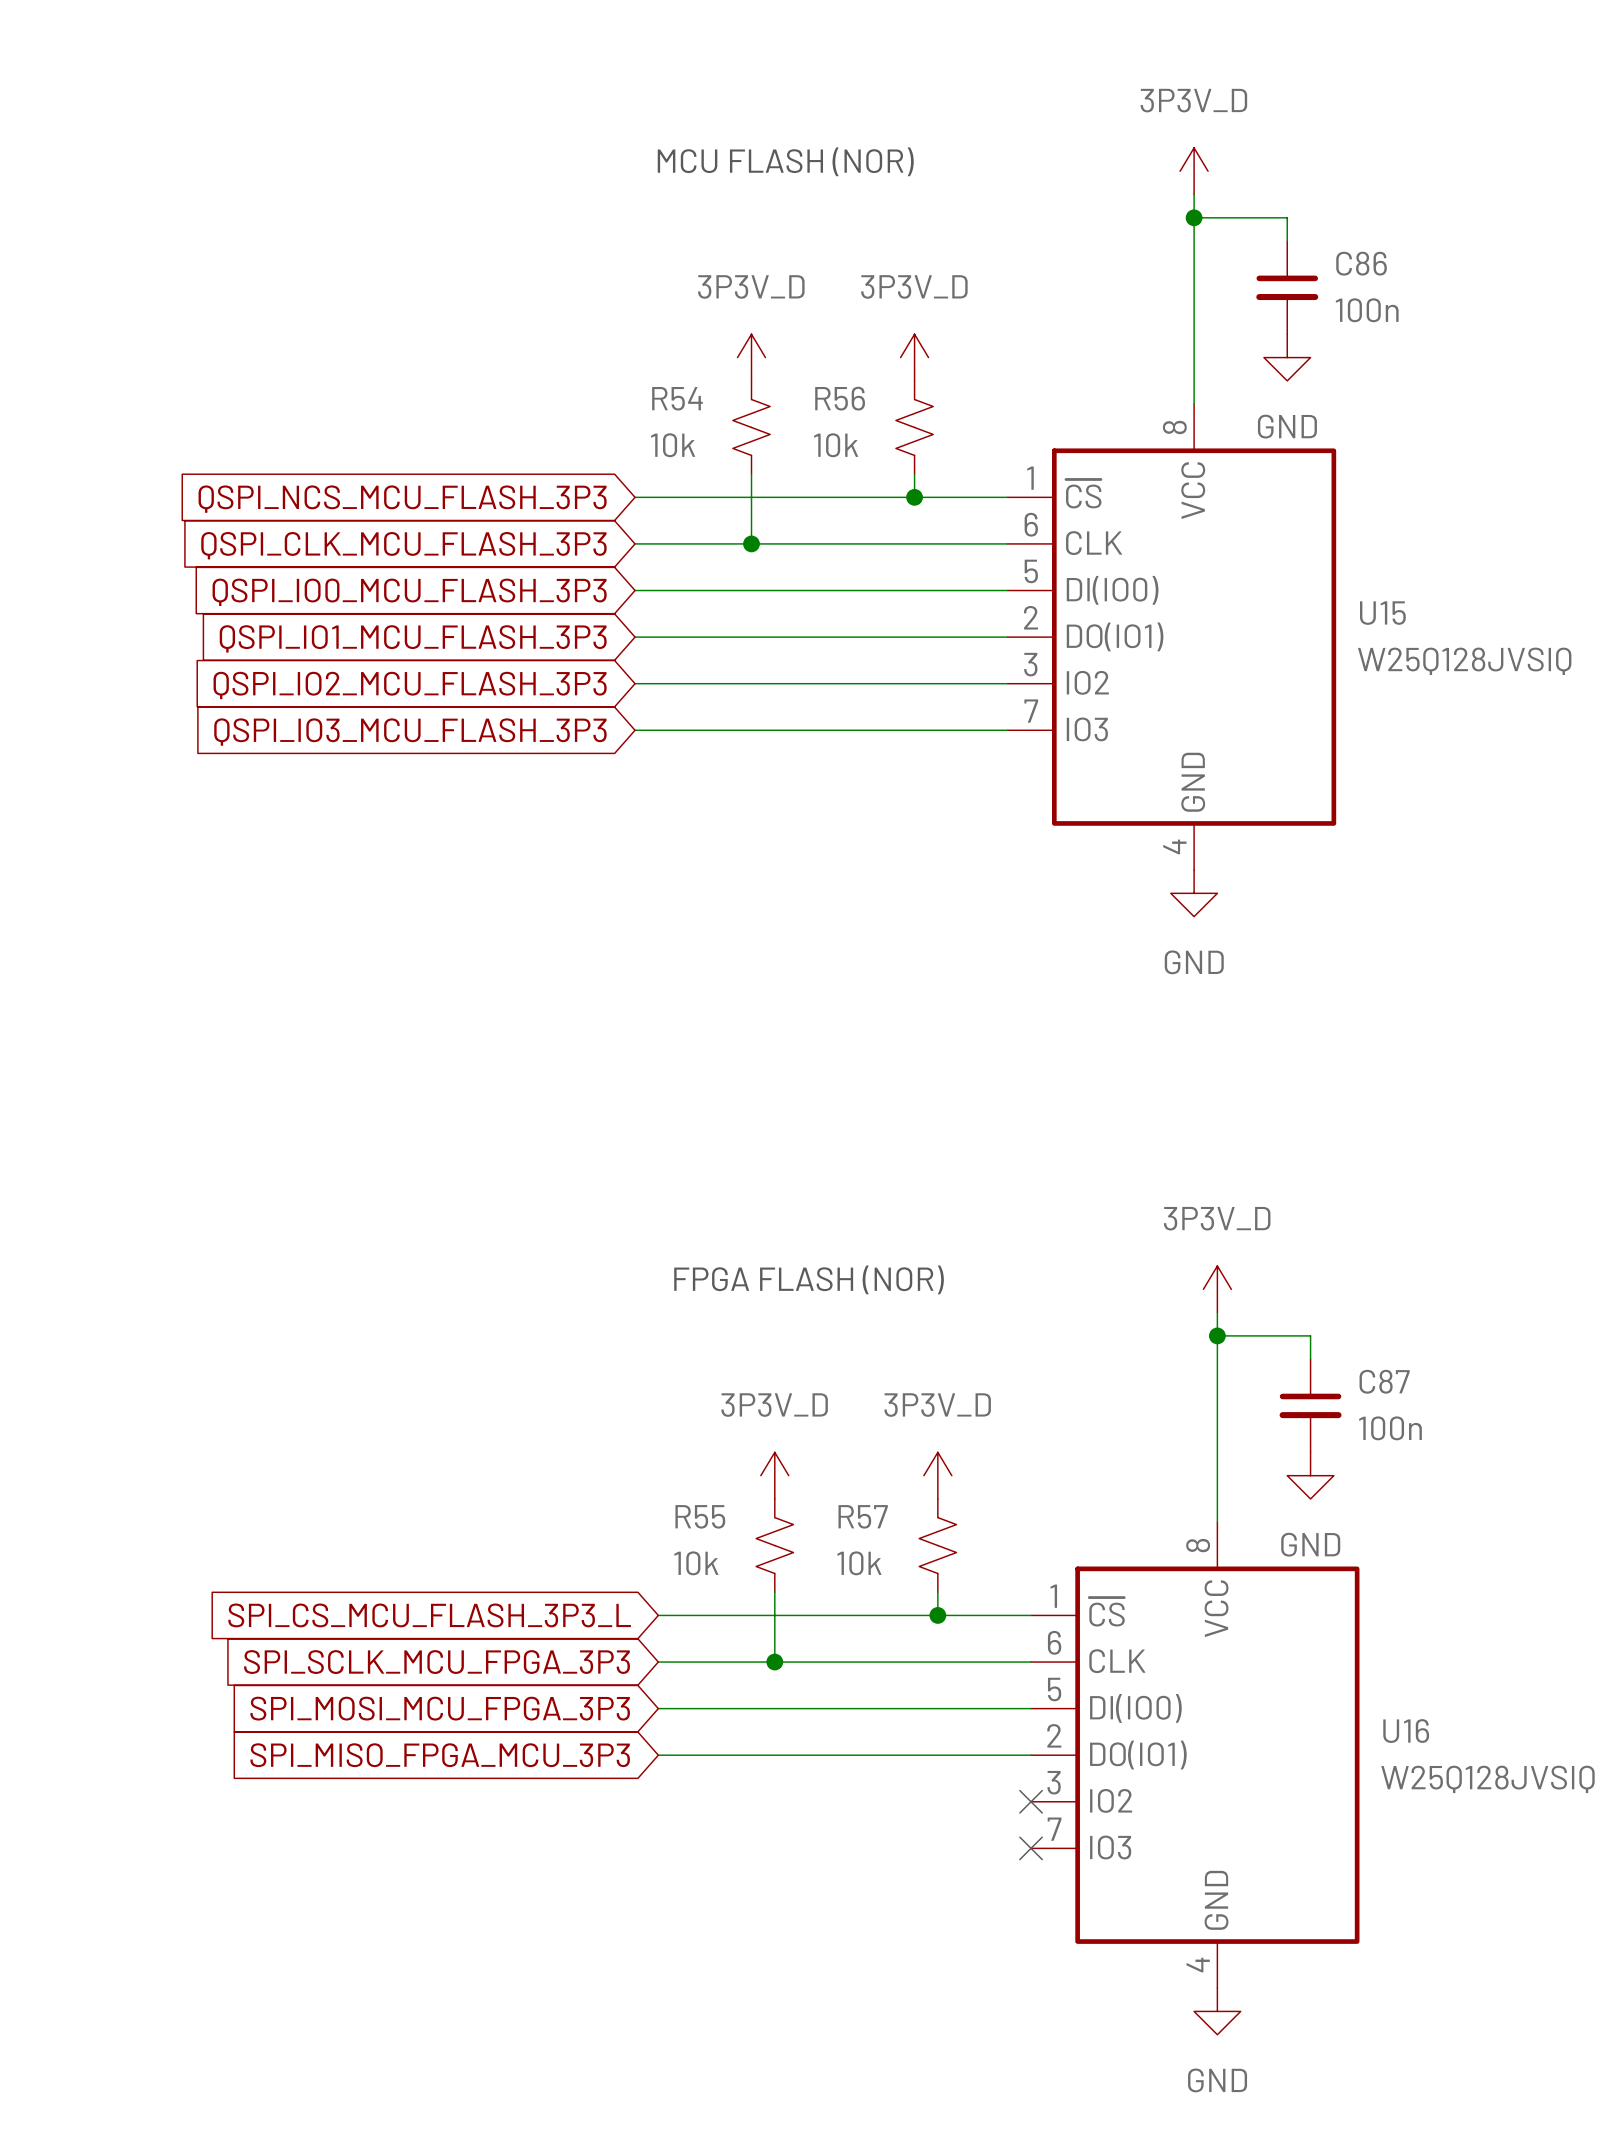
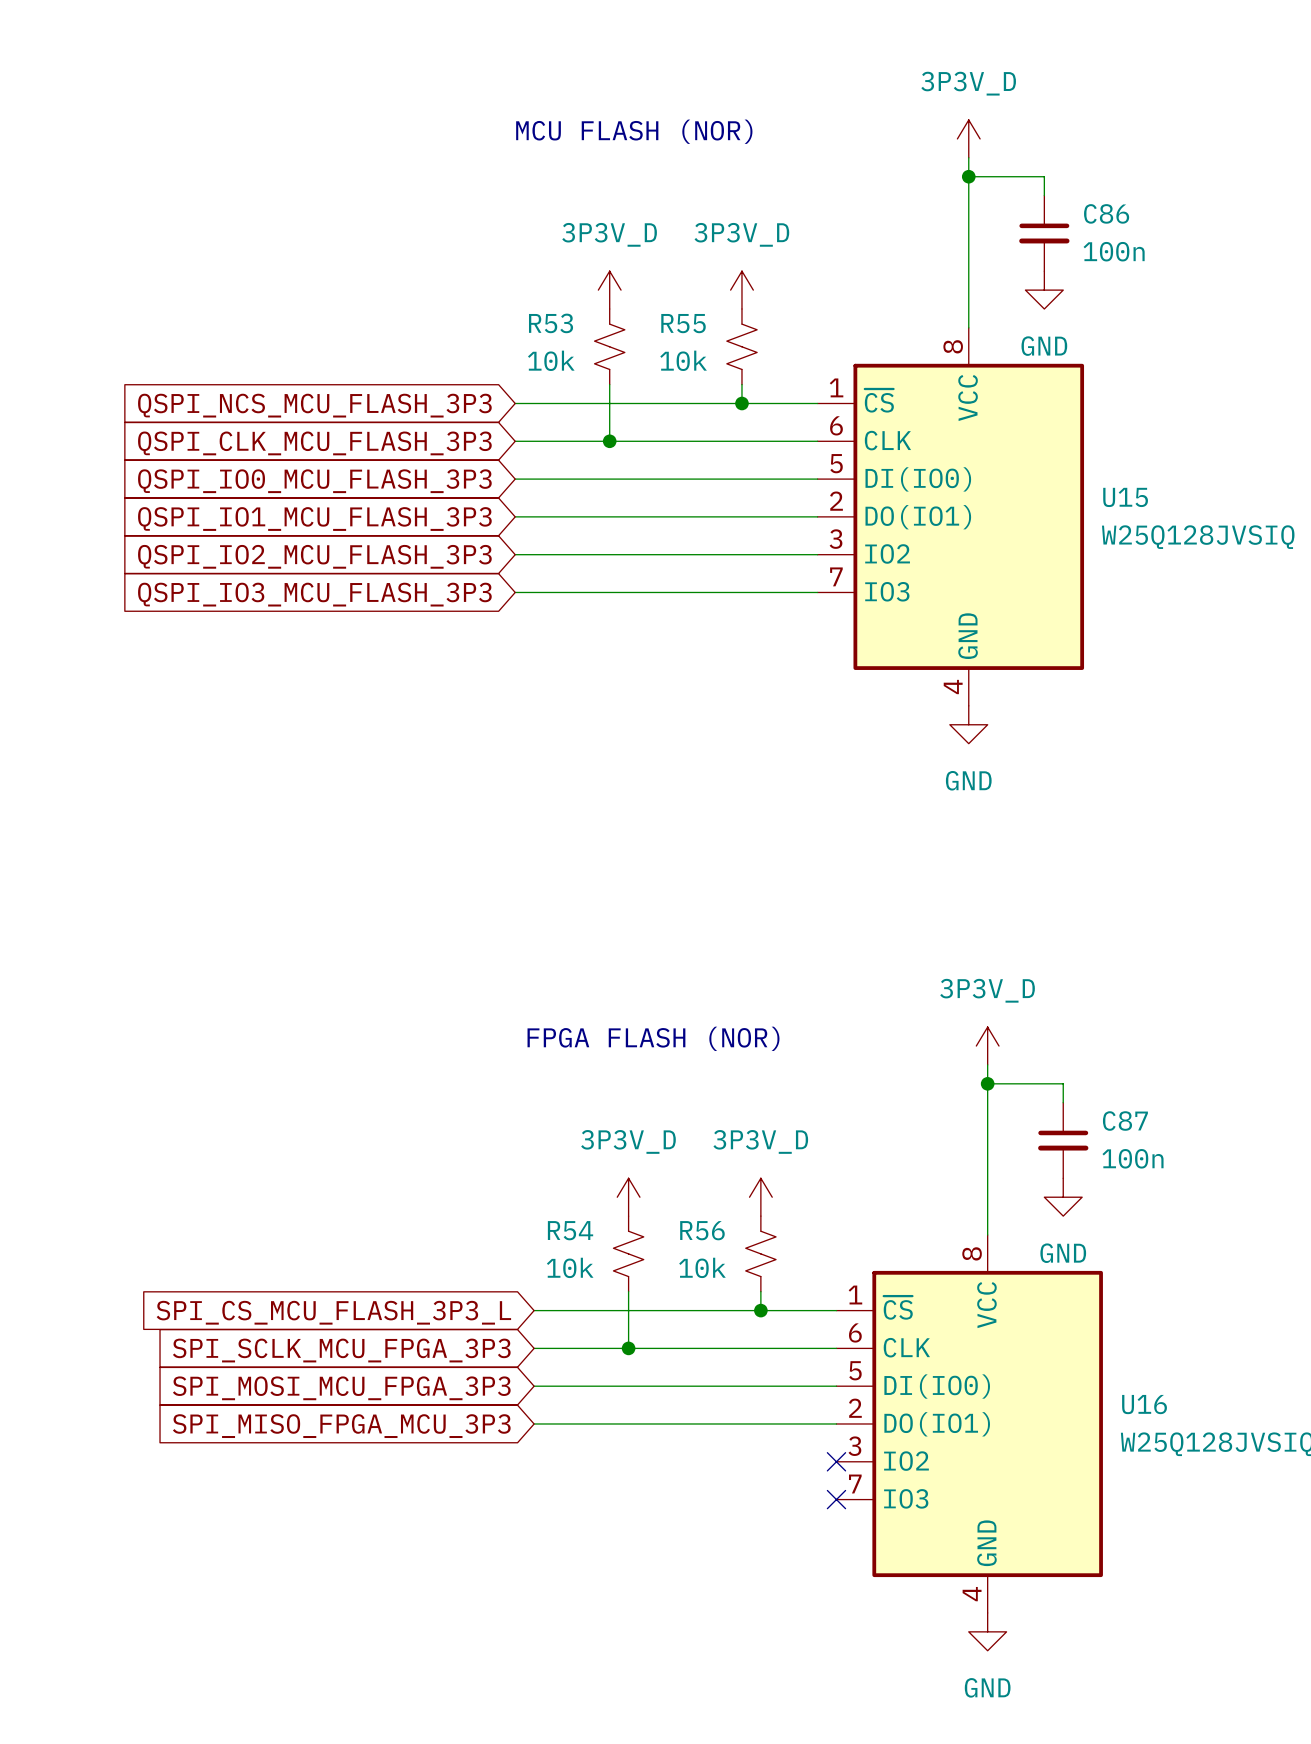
R54 name: R54 (677, 398) -> R53 (551, 323)
R56 name: R56 (840, 398) -> R55 (683, 323)
R55 name: R55 (700, 1516) -> R54 (570, 1230)
R57 name: R57 (863, 1516) -> R56 (702, 1230)

